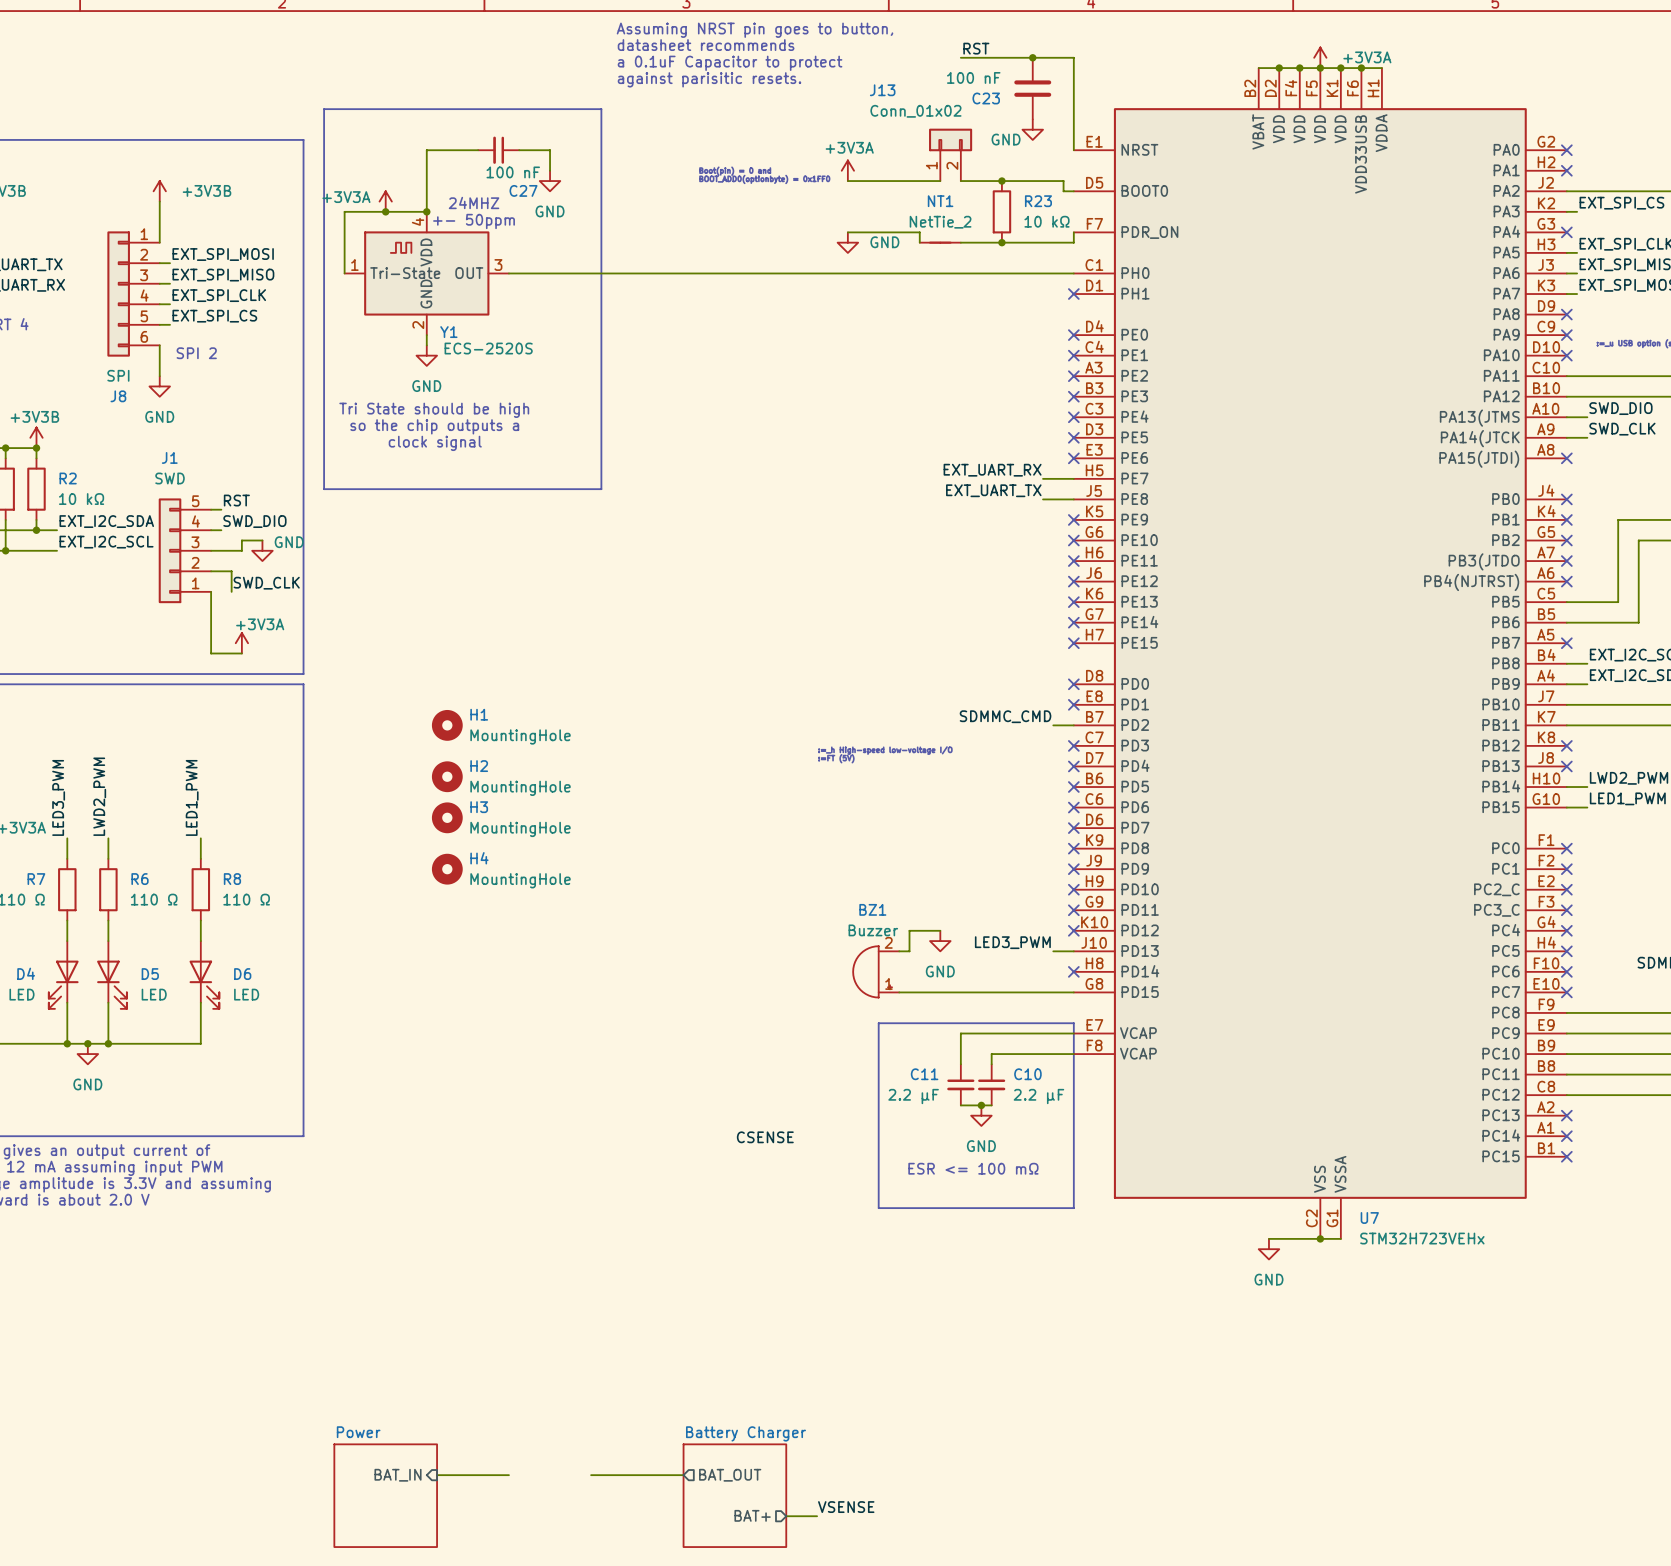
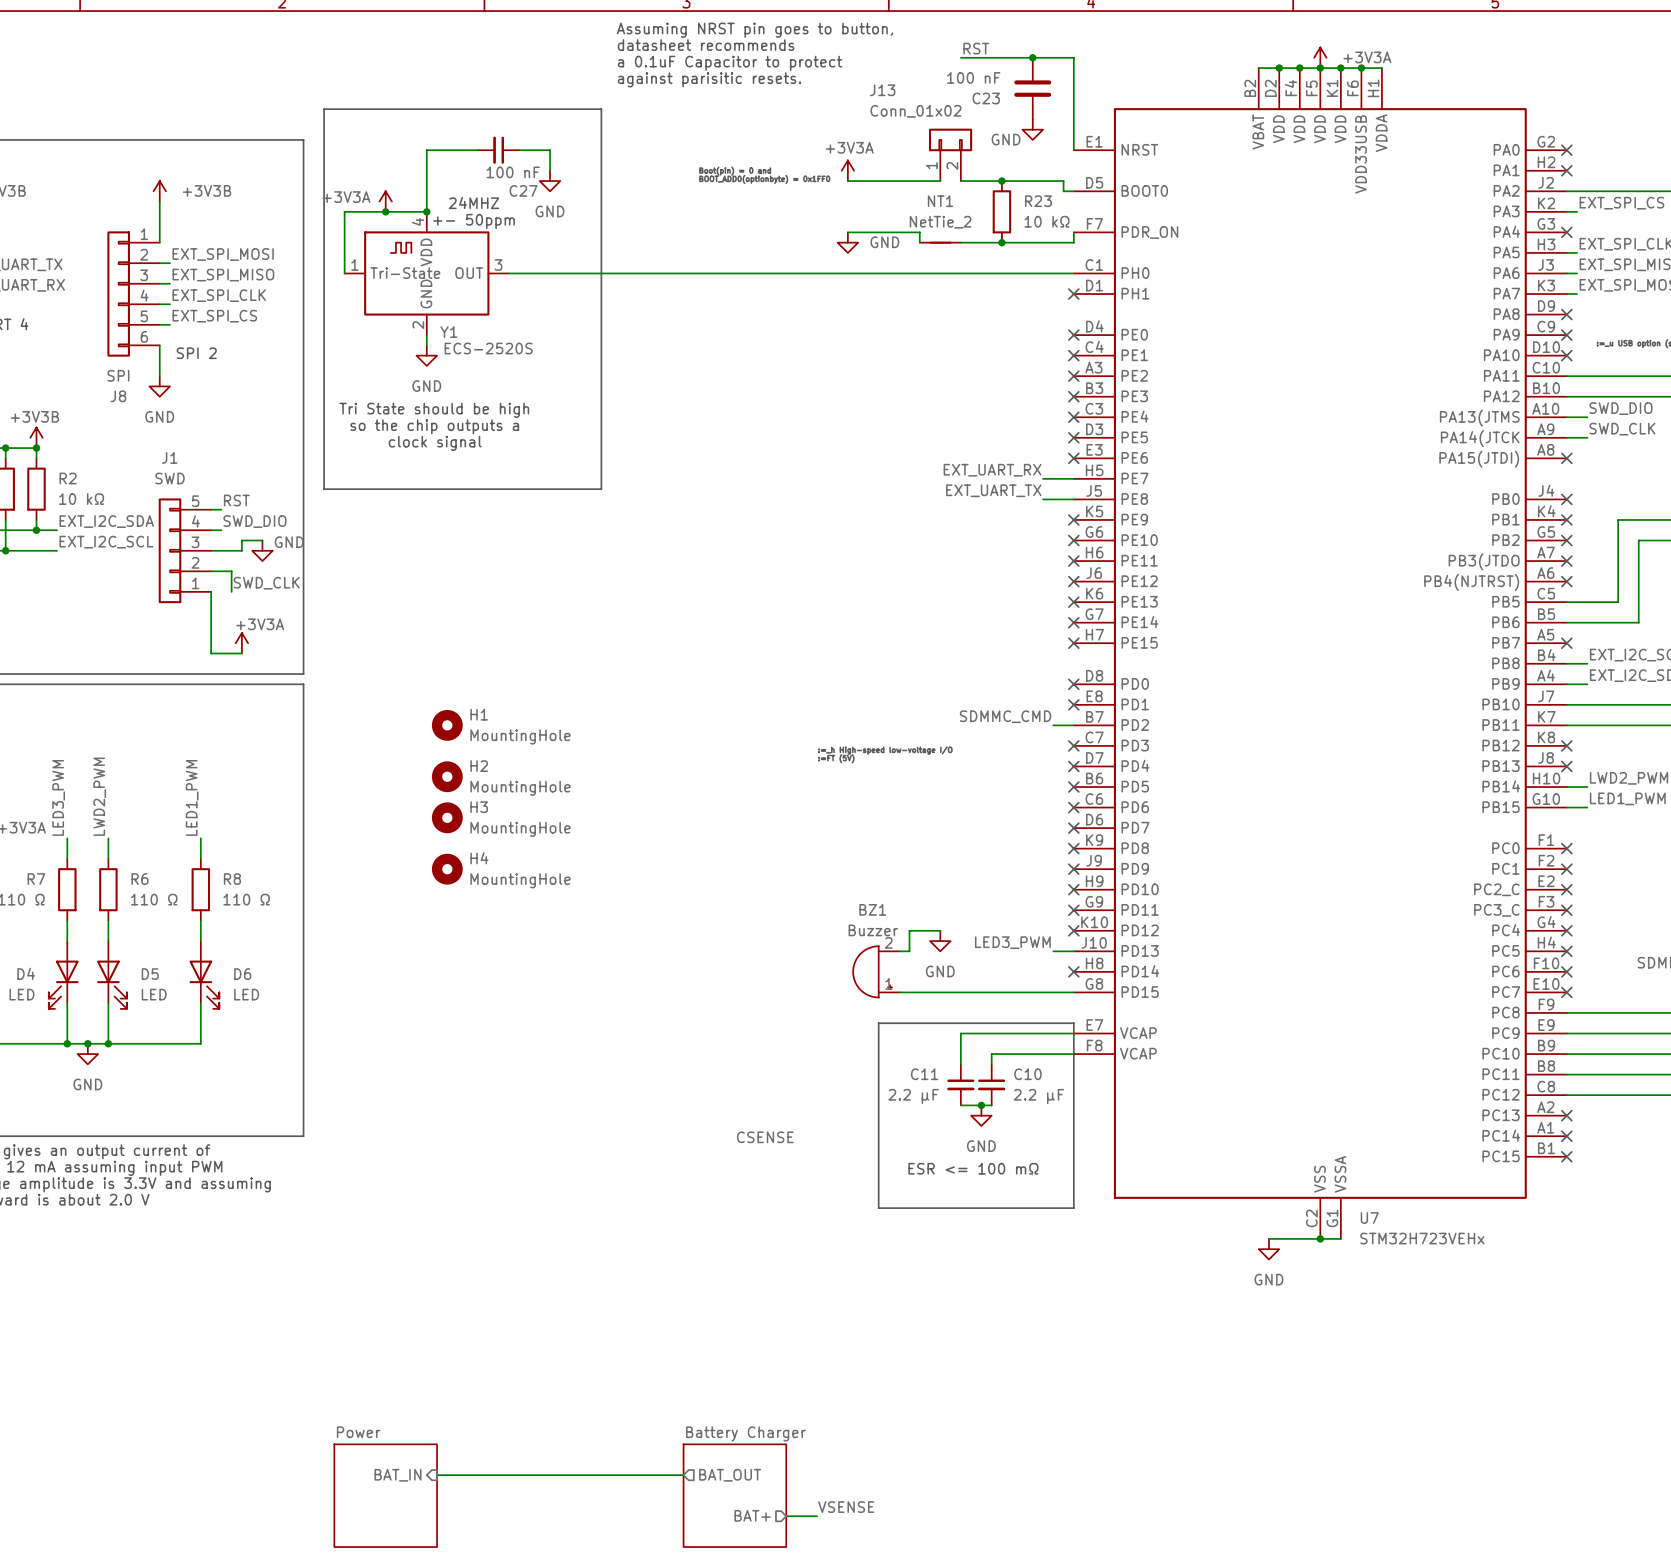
wire: none -> (508, 1475) (591, 1475)

